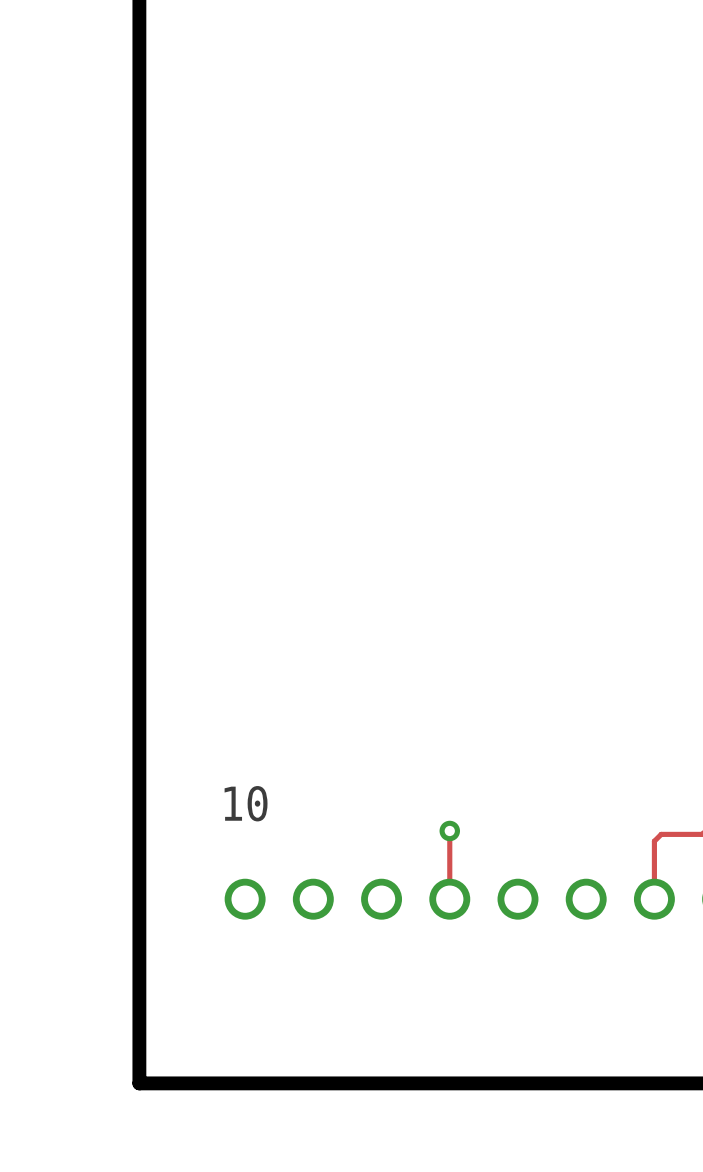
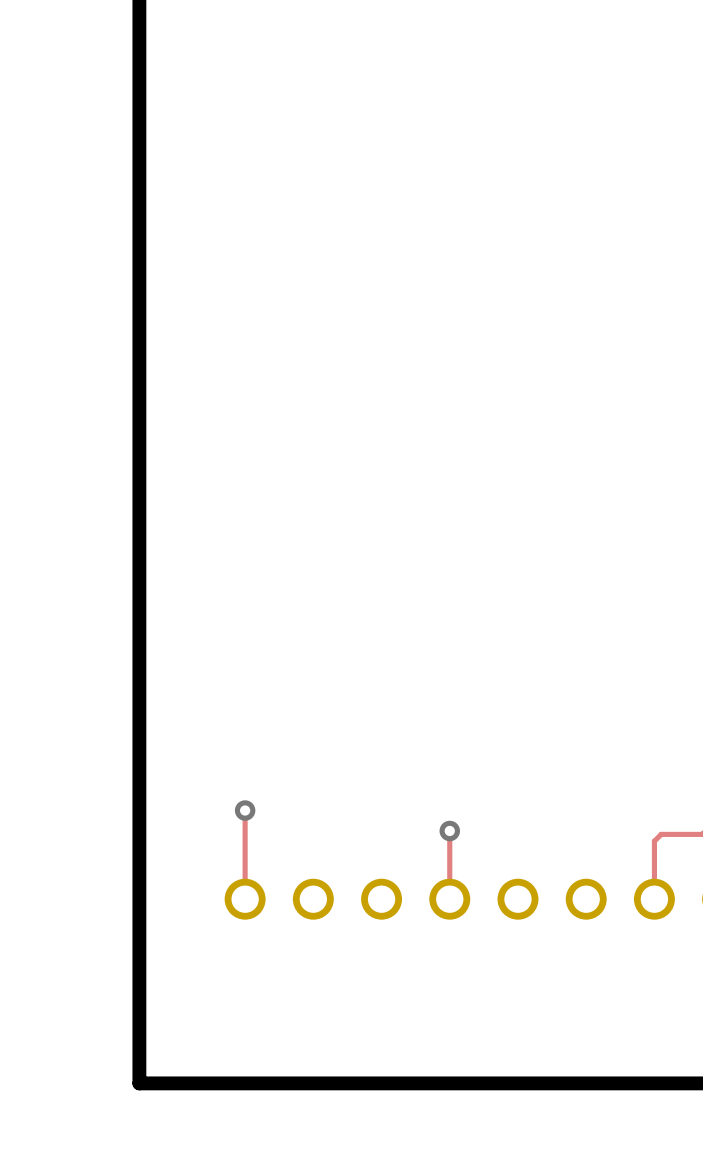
text: 10 (246, 803) -> none
track: none -> (245, 810) (245, 899)
via: none -> (245, 810)

